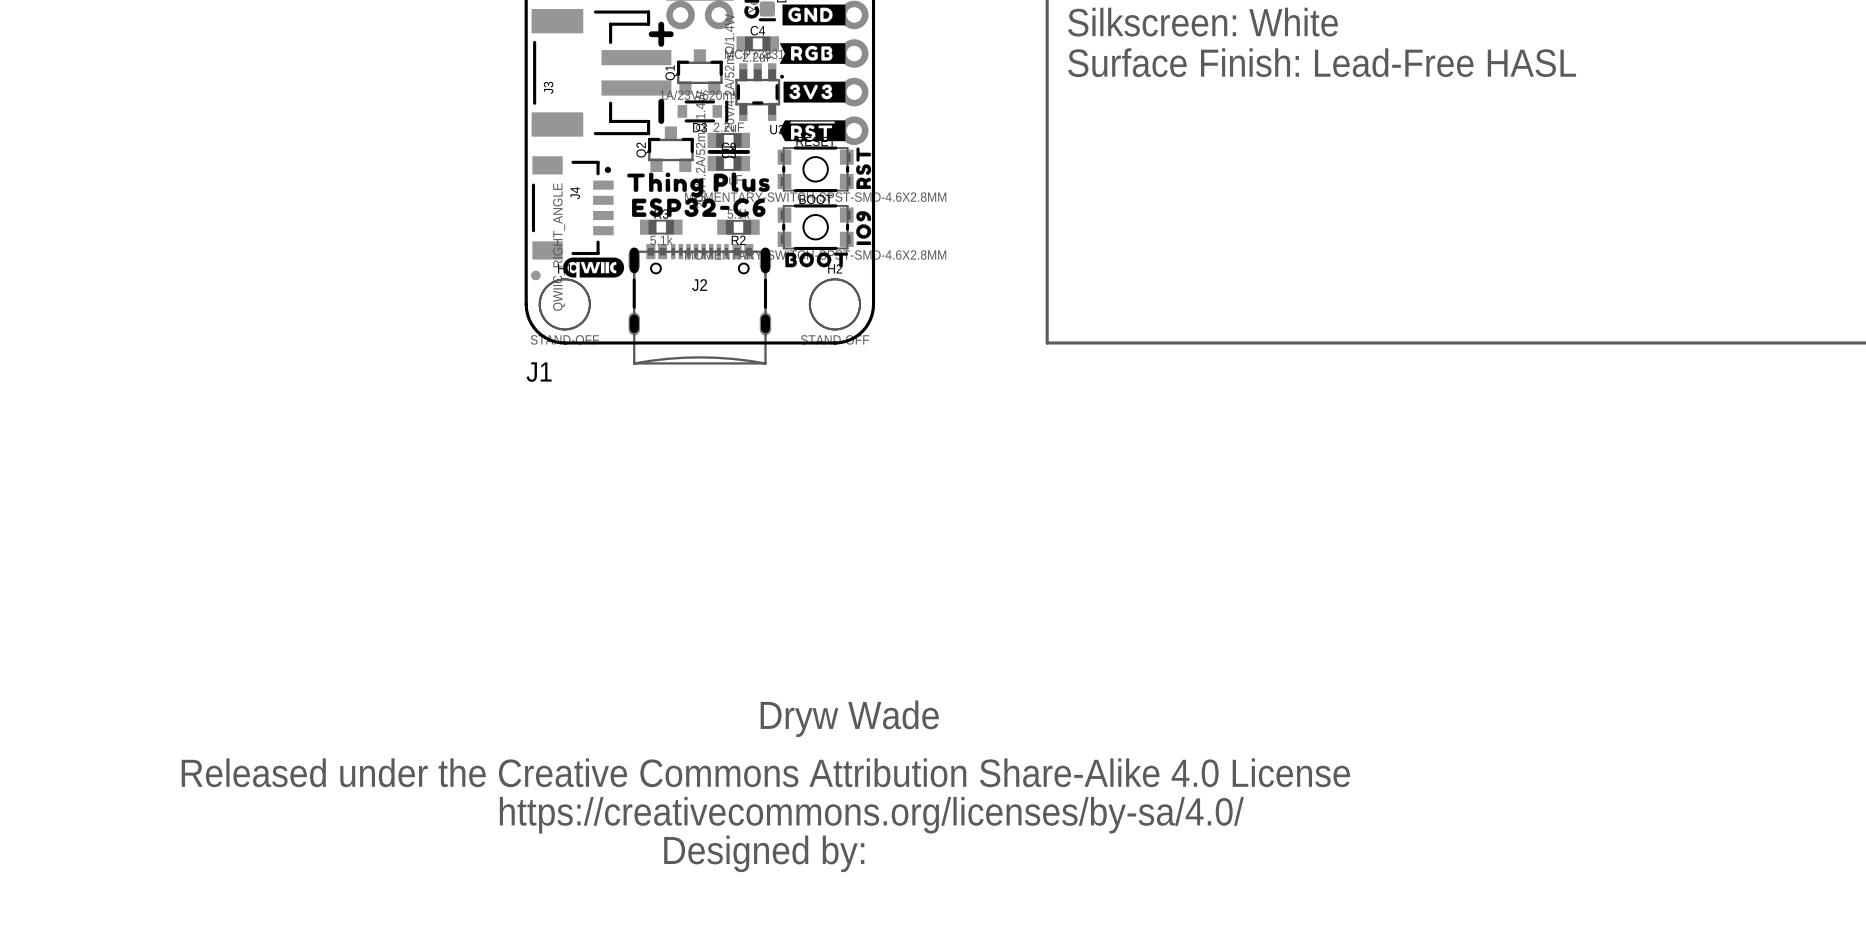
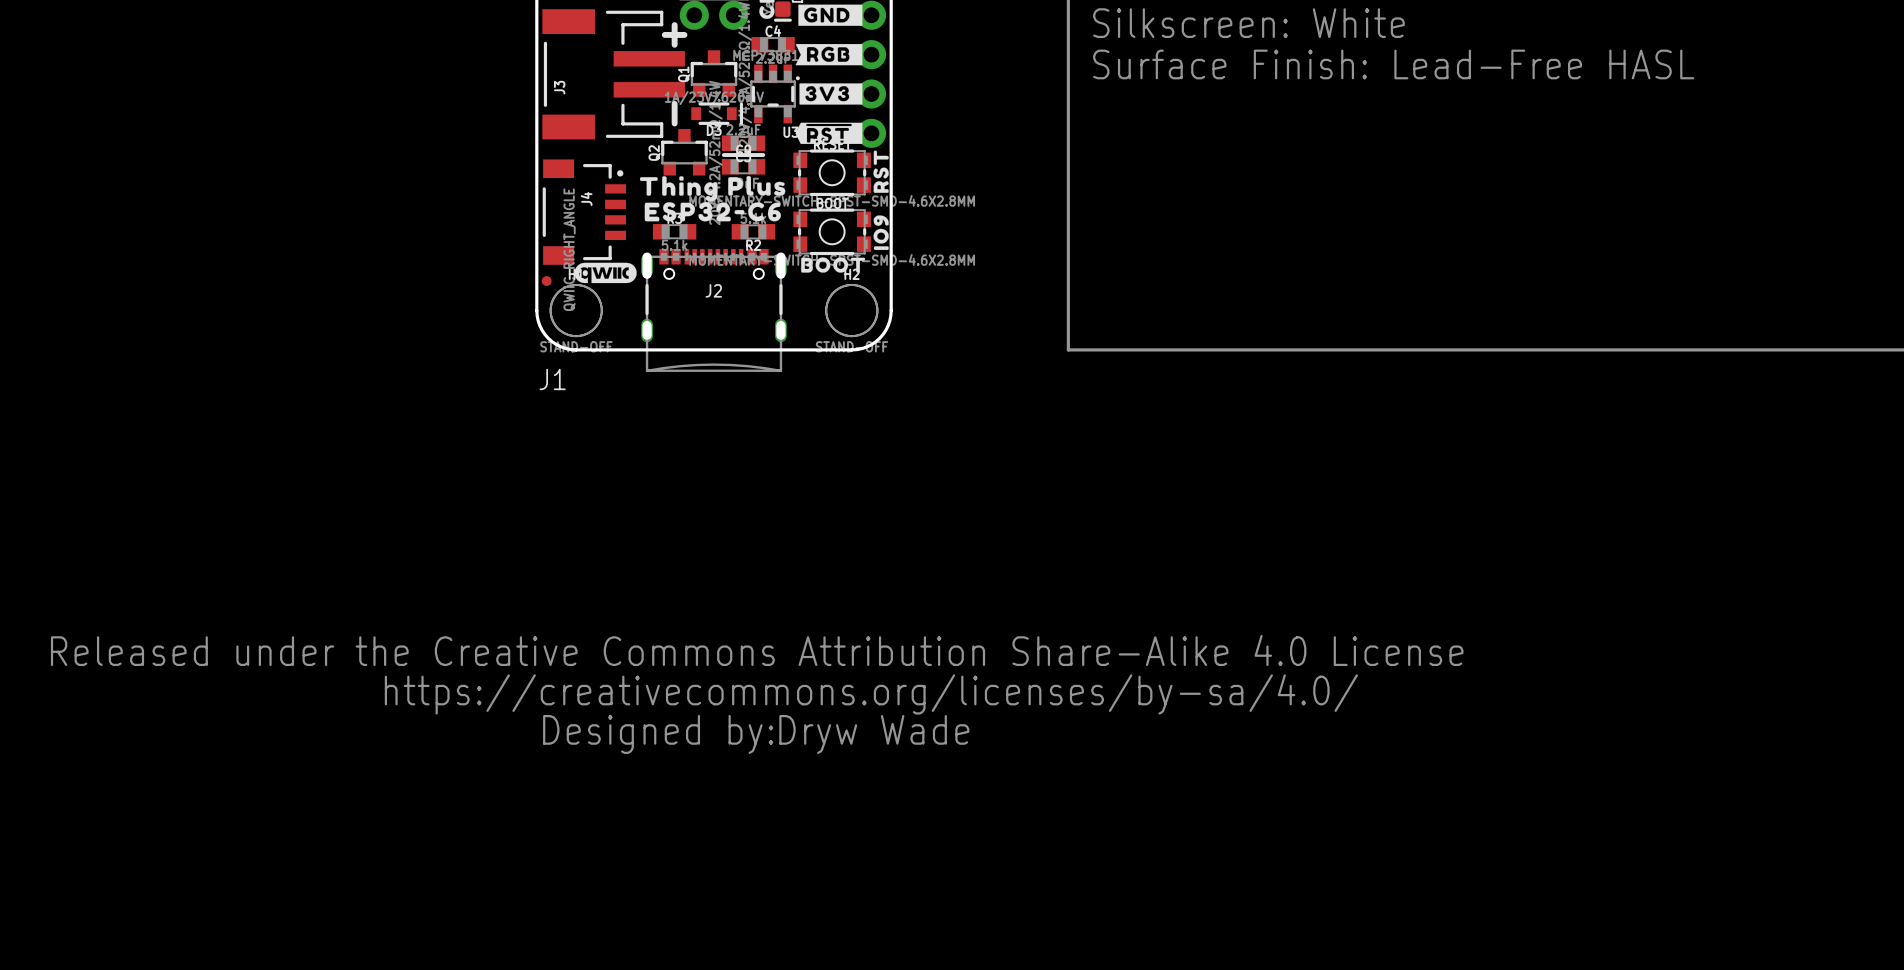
drawing position: (765, 815) -> (757, 694)

